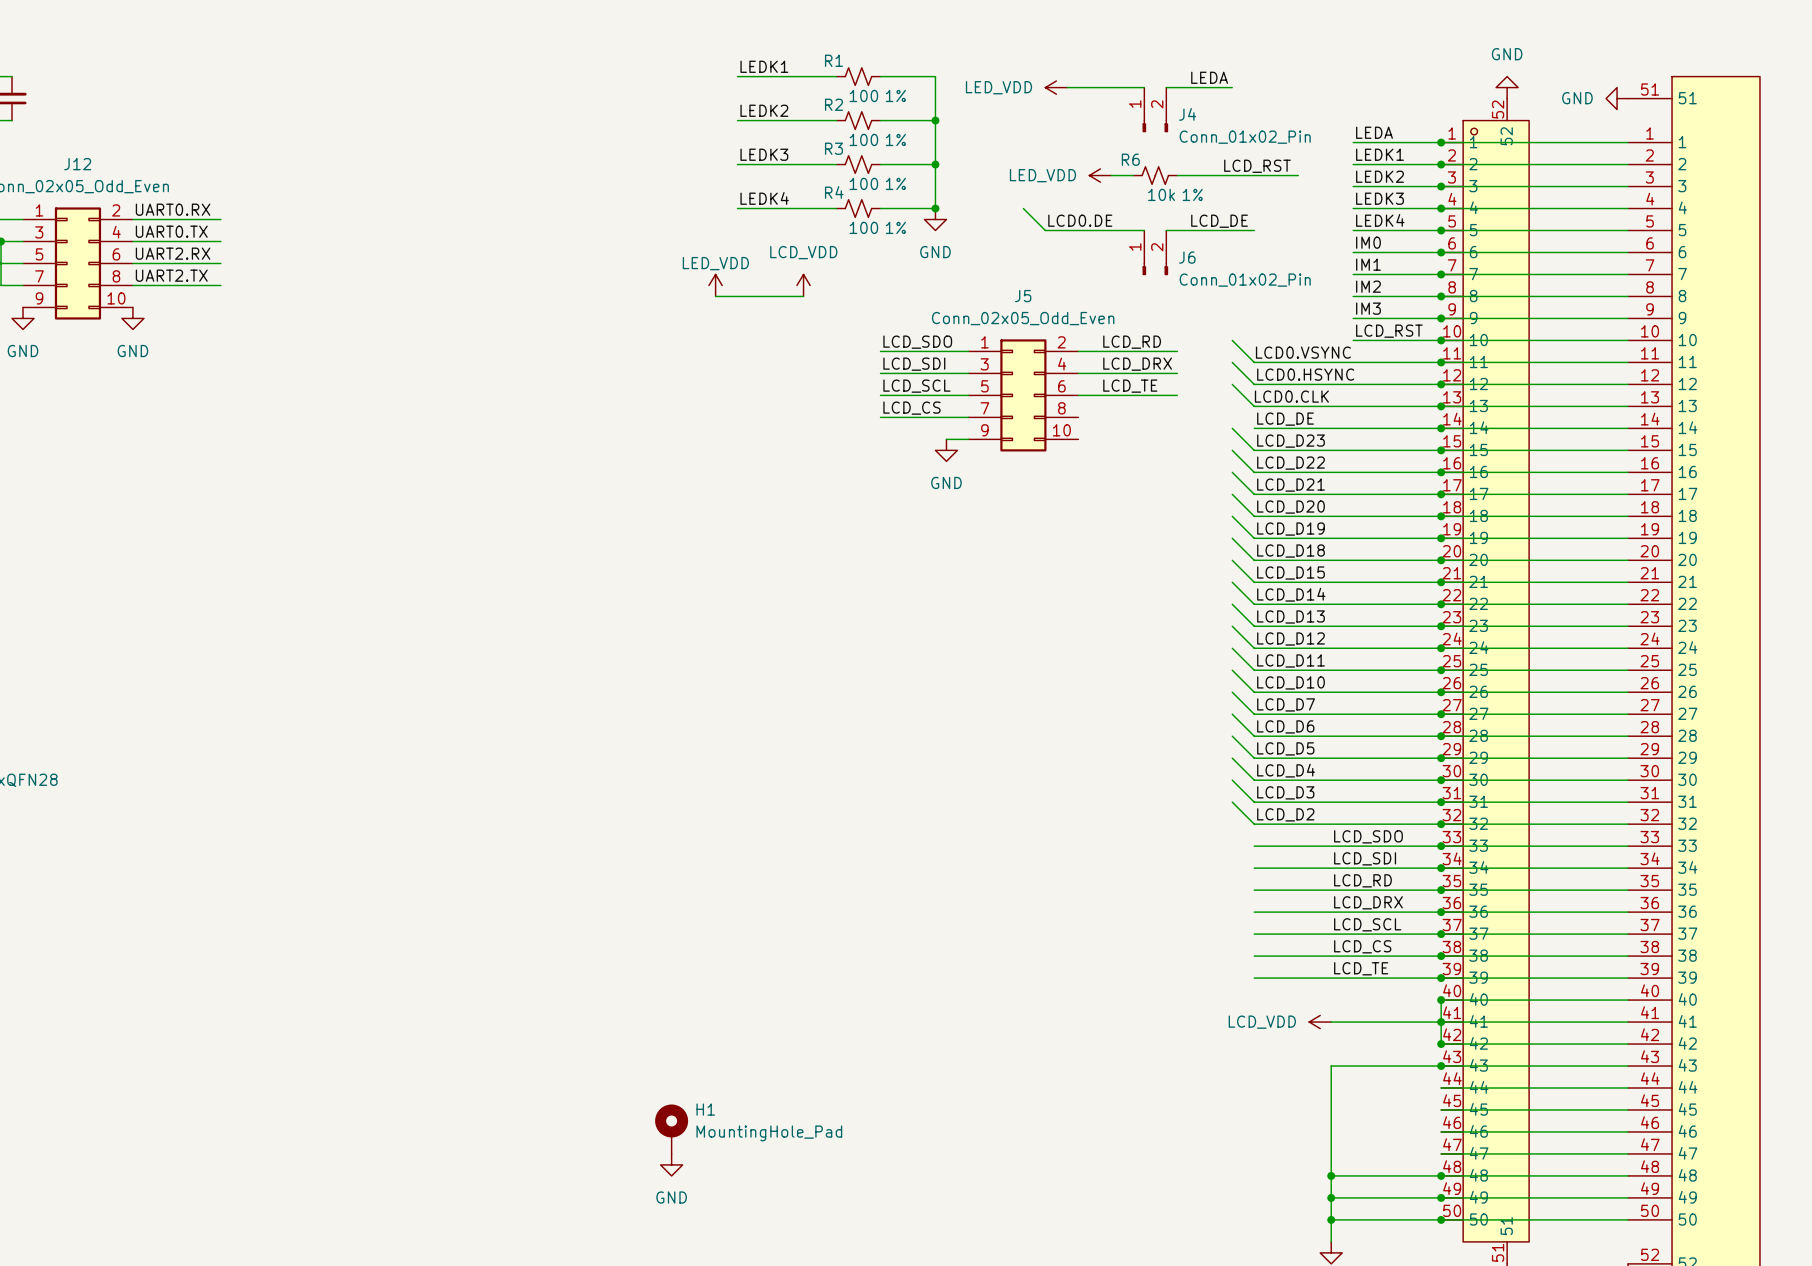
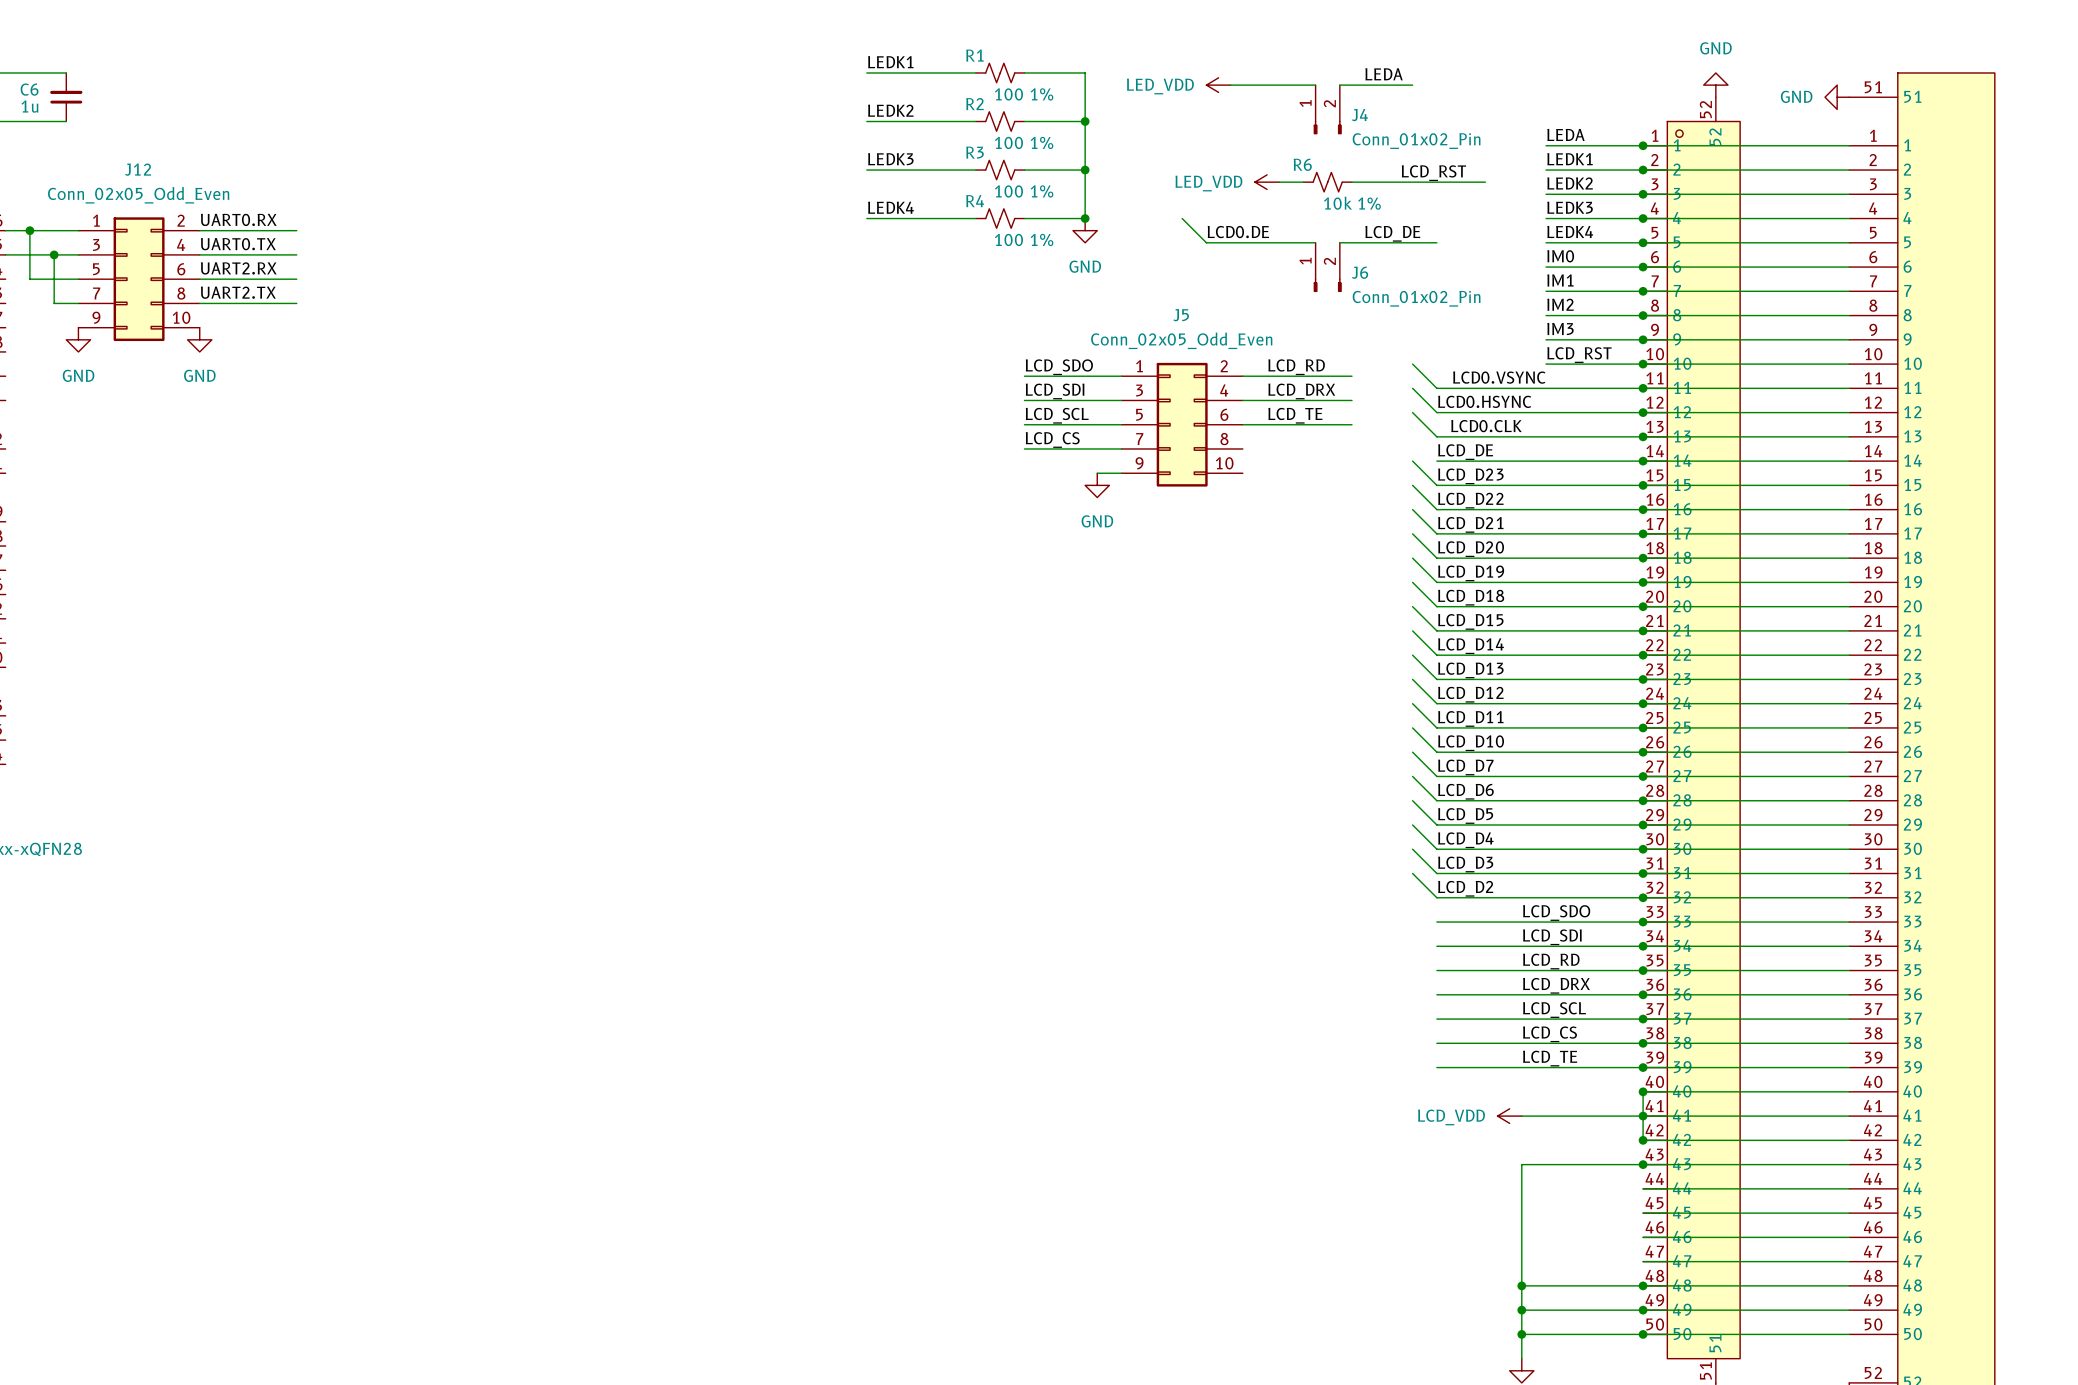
power symbol: LED_VDD (715, 285) -> none
power symbol: LCD_VDD (803, 285) -> none
wire: (715, 296) (803, 296) -> none
H1: MountingHole_Pad (671, 1129) -> none
power symbol: GND (671, 1164) -> none

